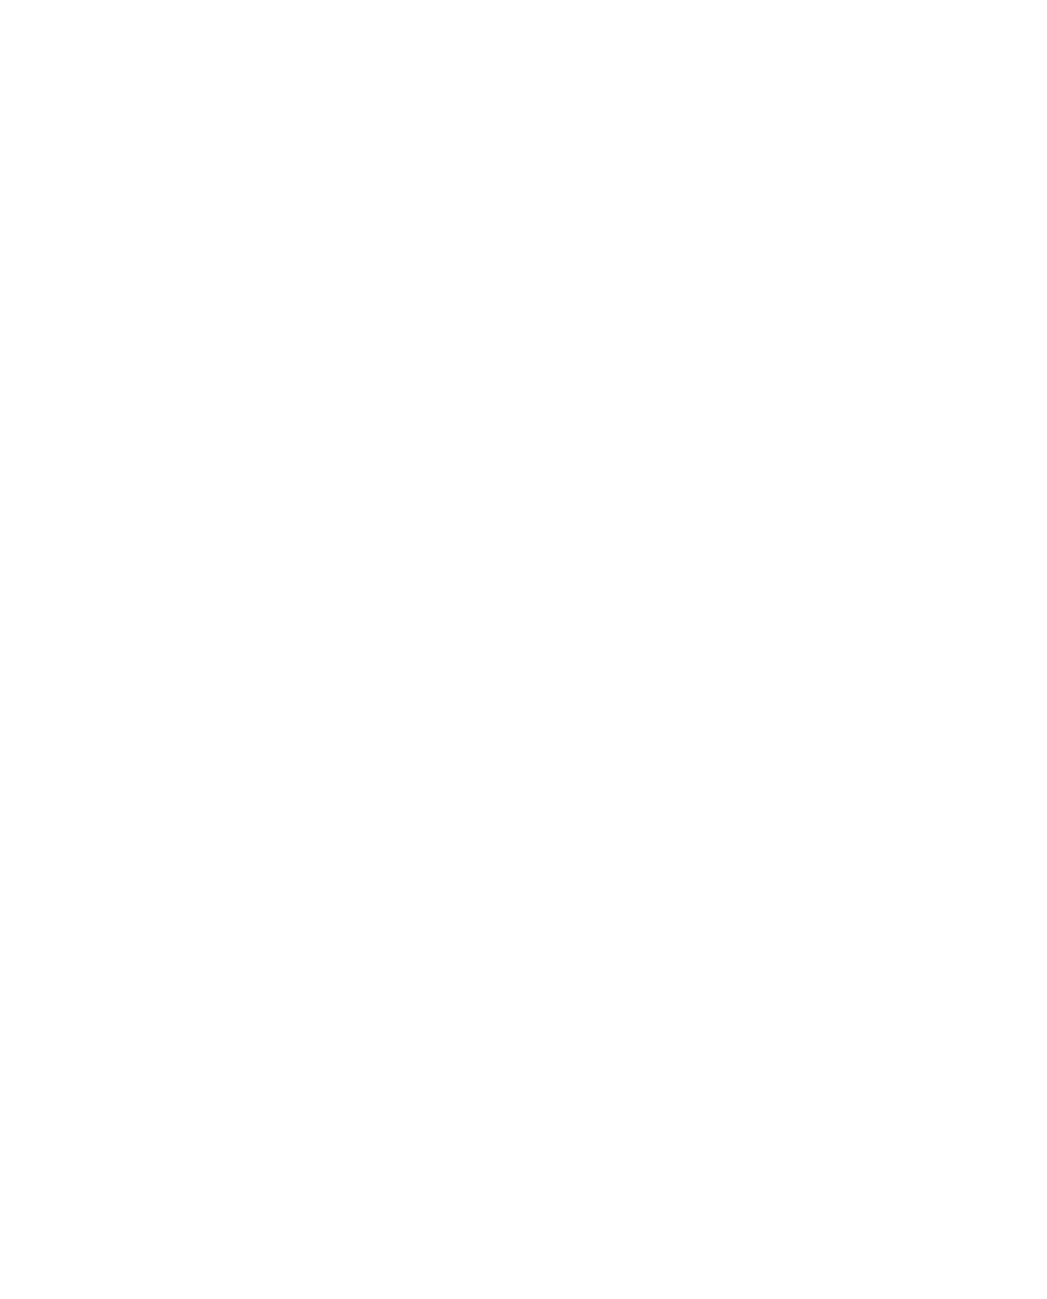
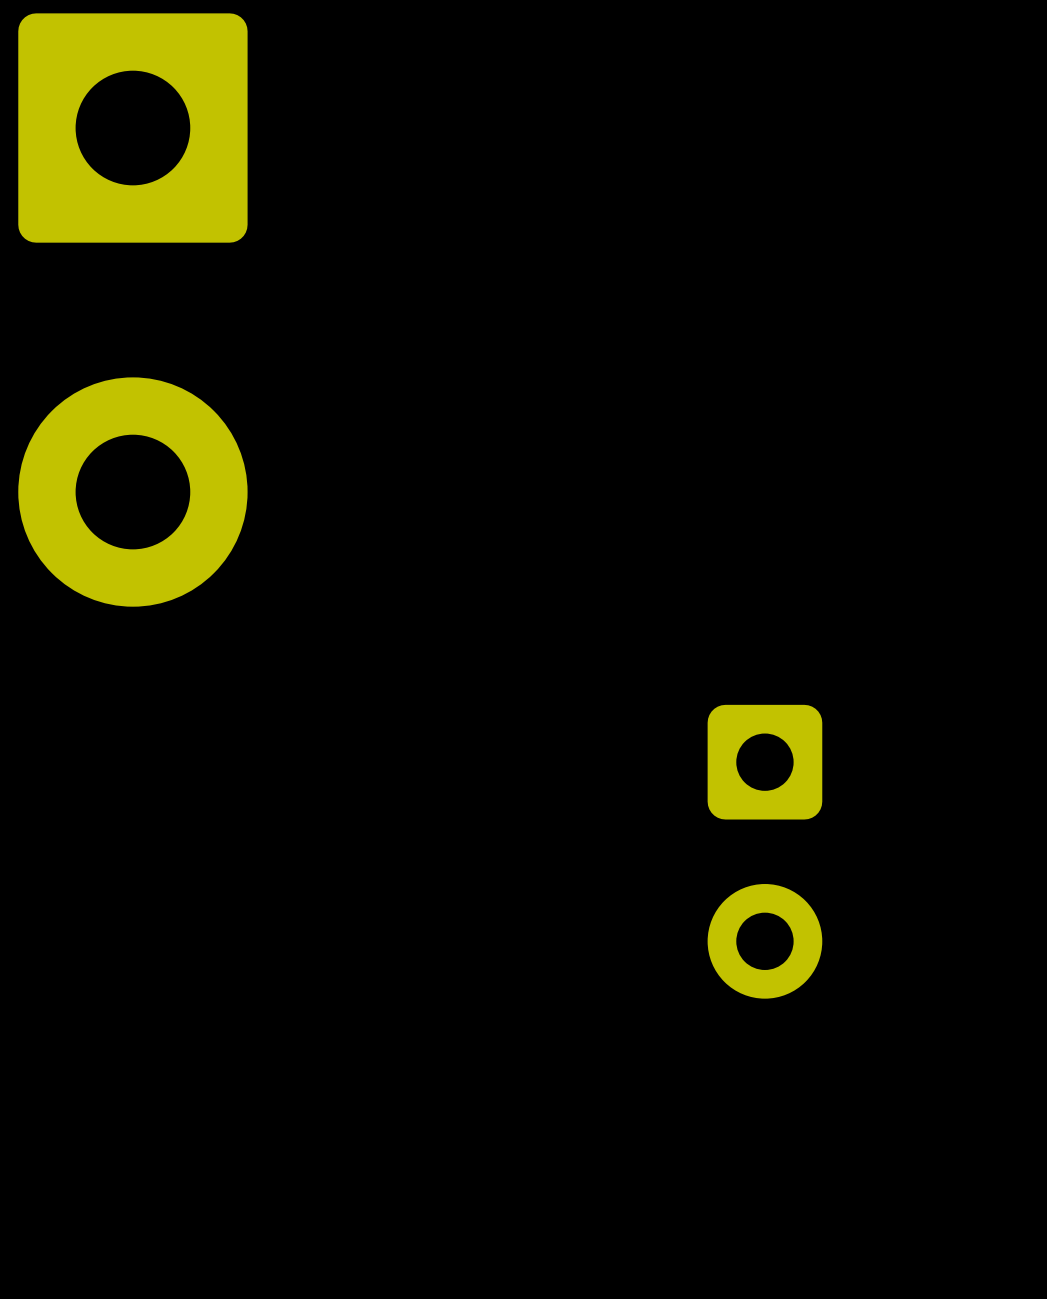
part: none -> (132, 310)
part: none -> (764, 851)

